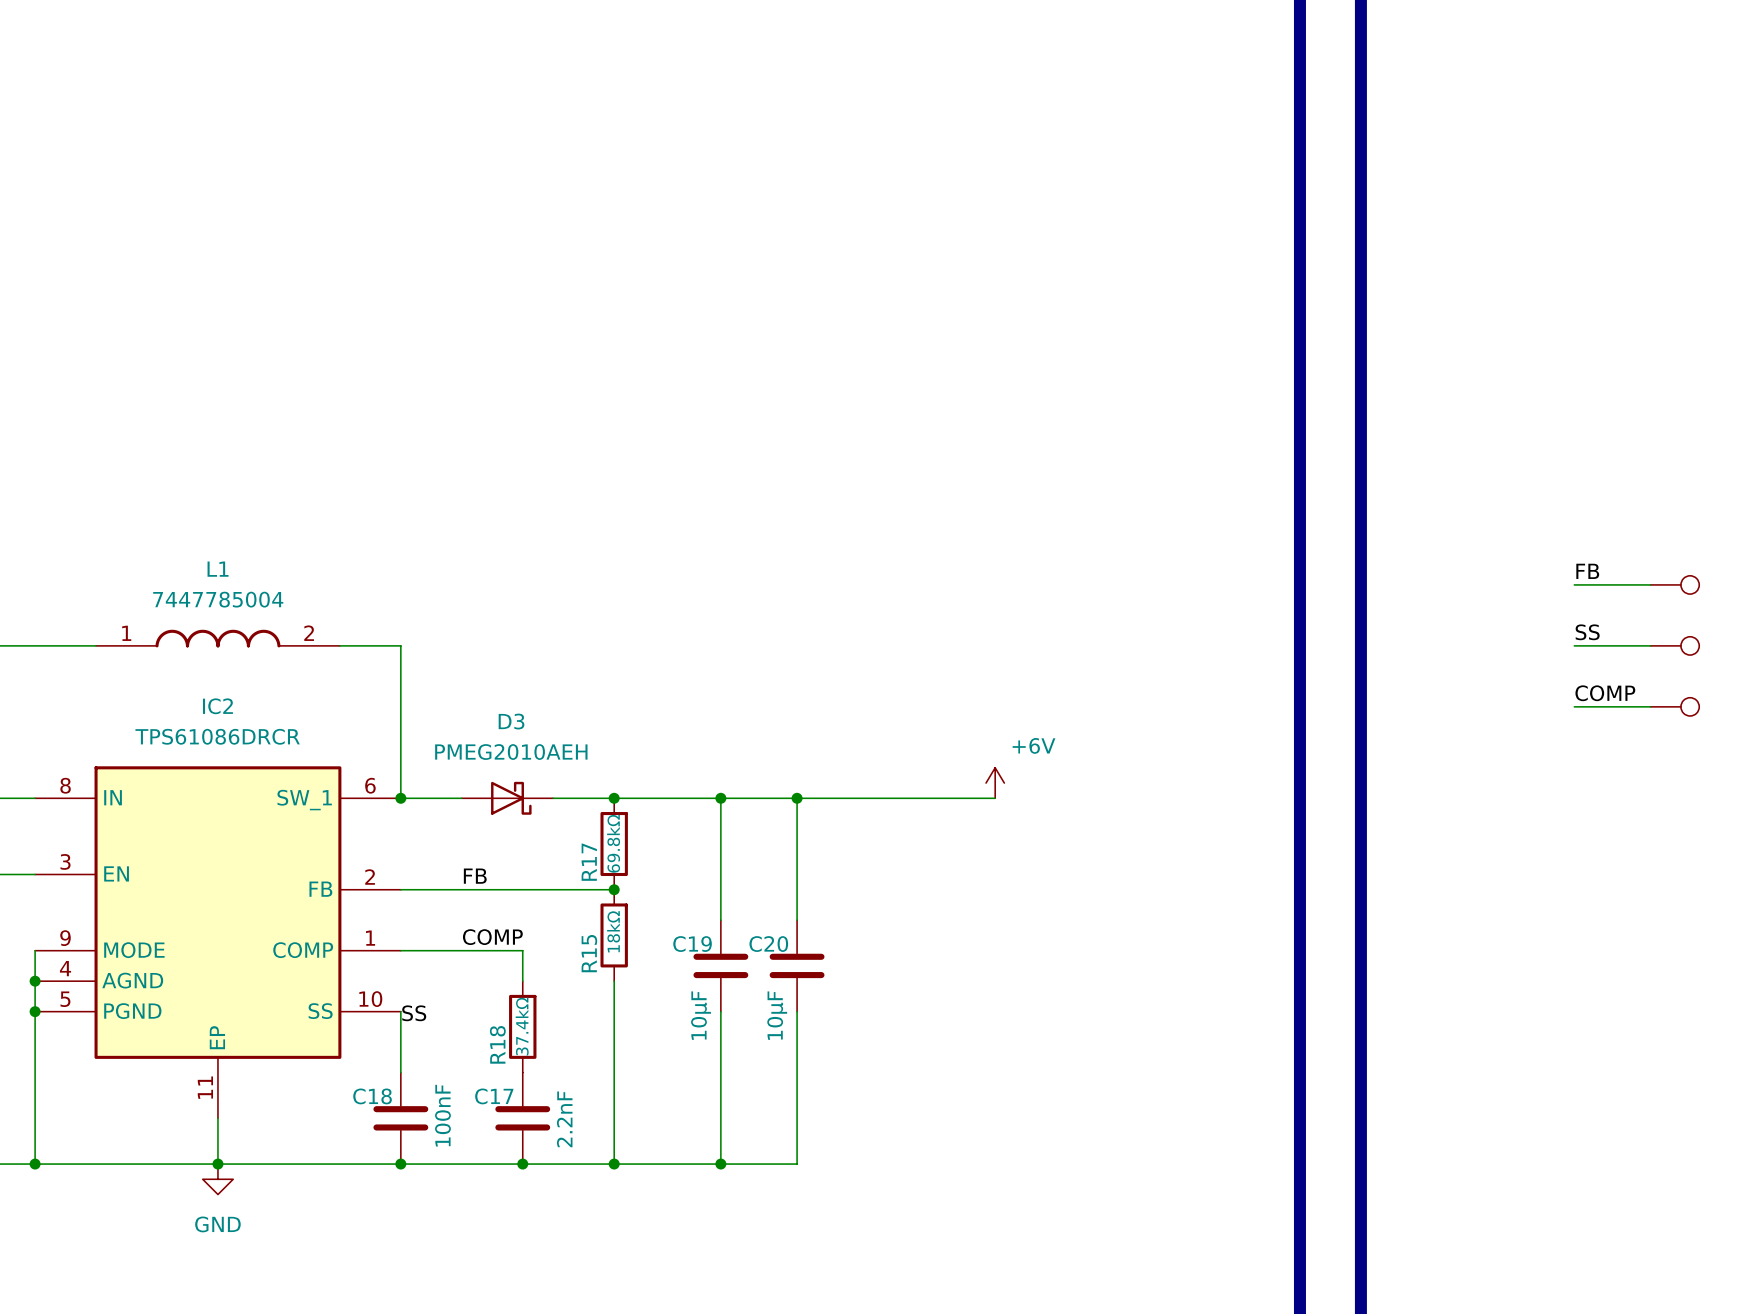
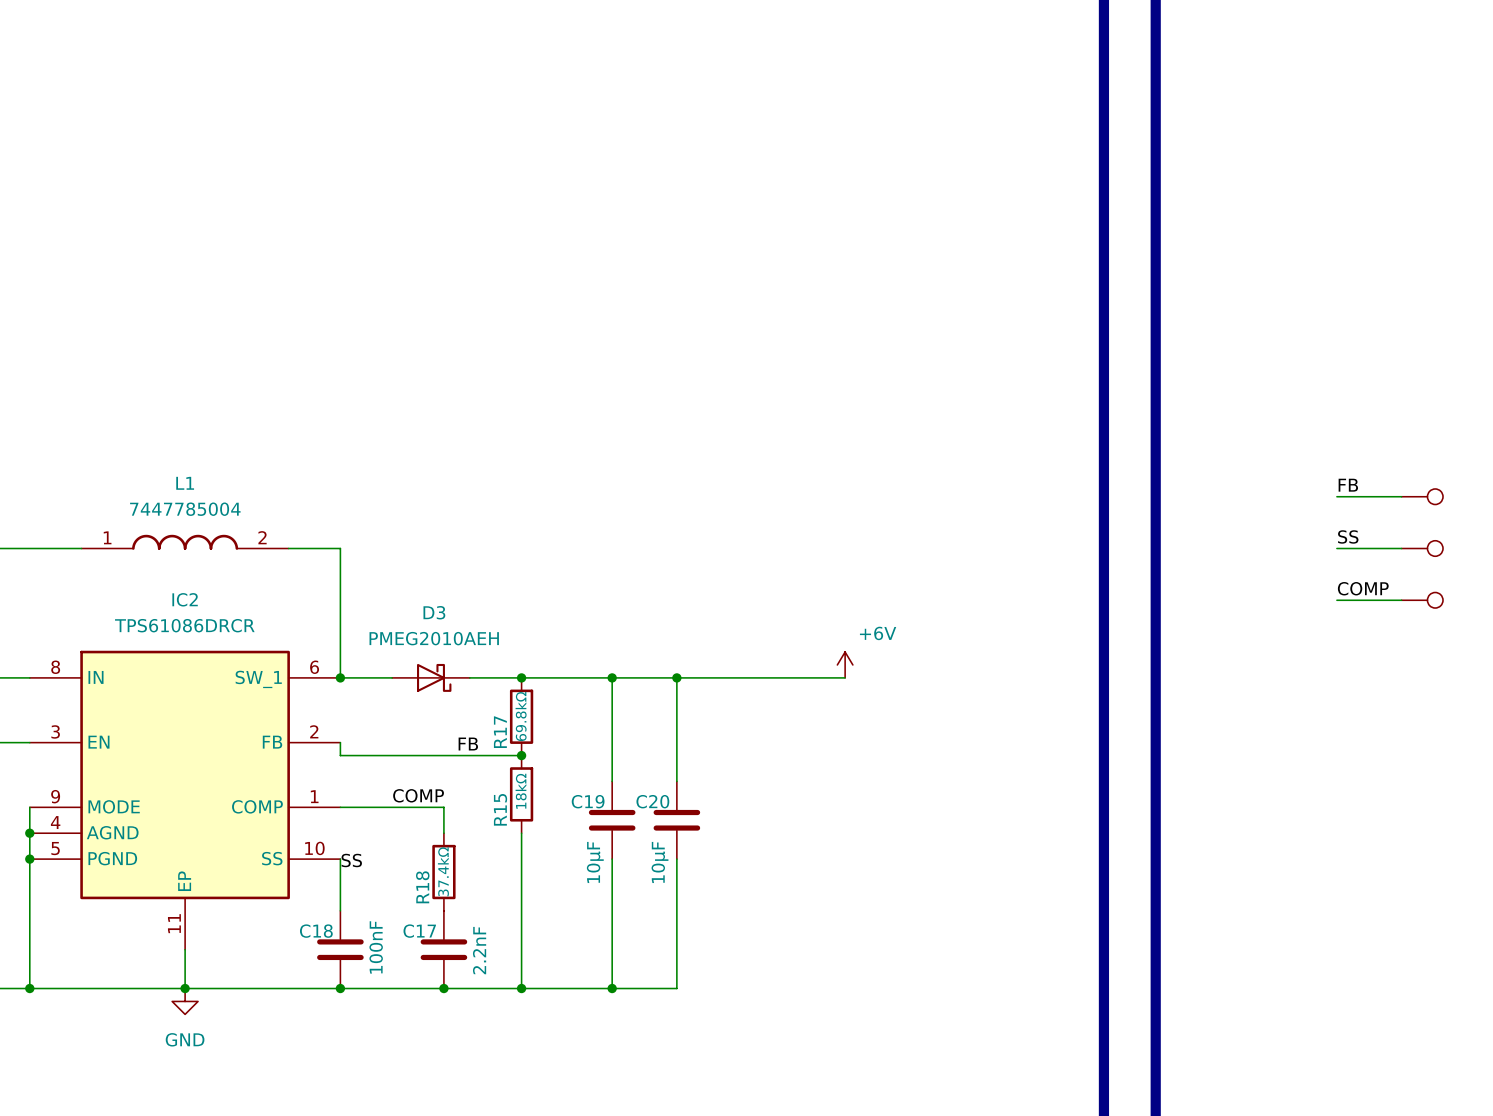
IC2 symbol: [35, 766, 401, 1119] -> [29, 650, 341, 950]
wire: none -> (340, 742) (340, 755)
label position: FB (475, 876) -> FB (468, 744)

